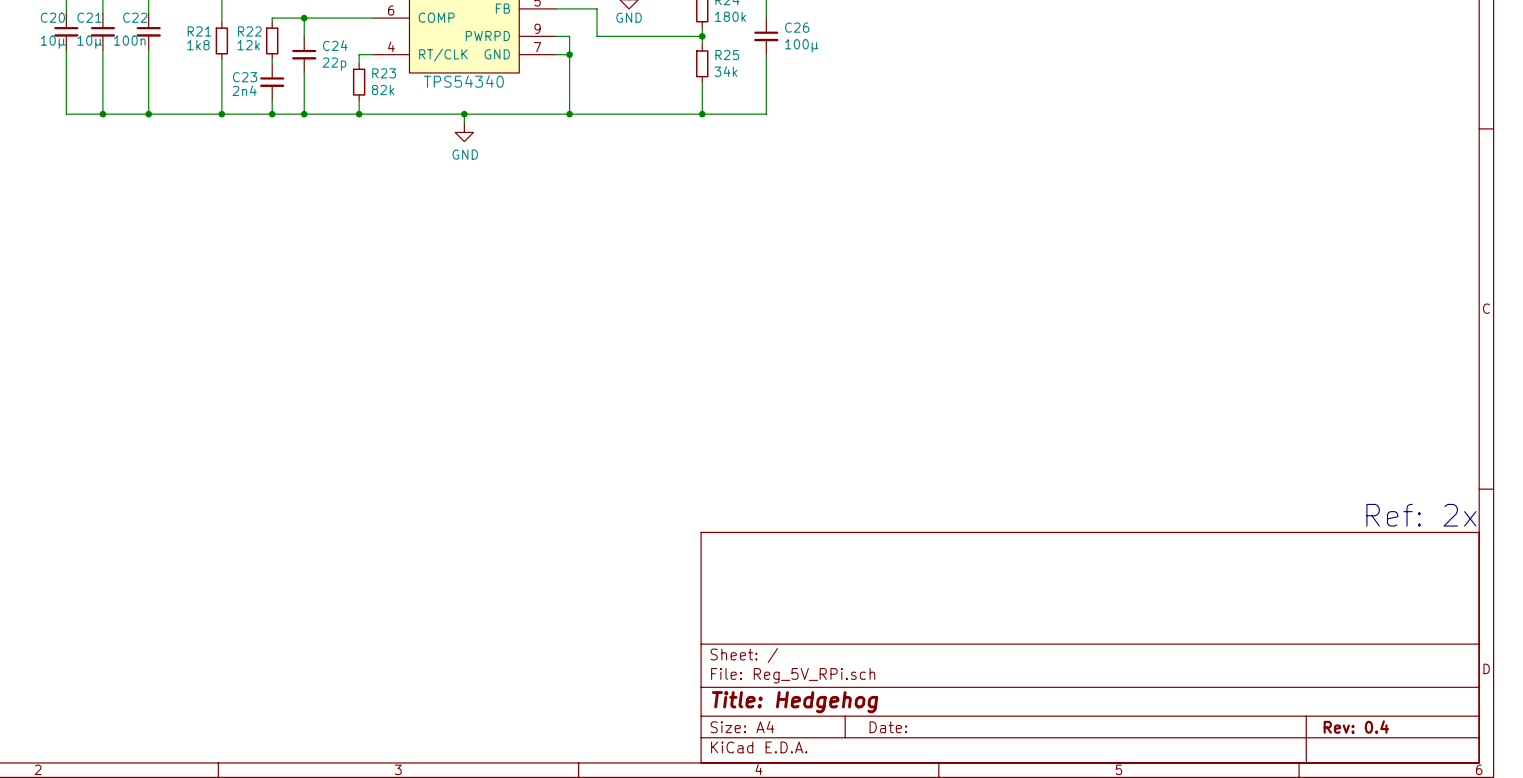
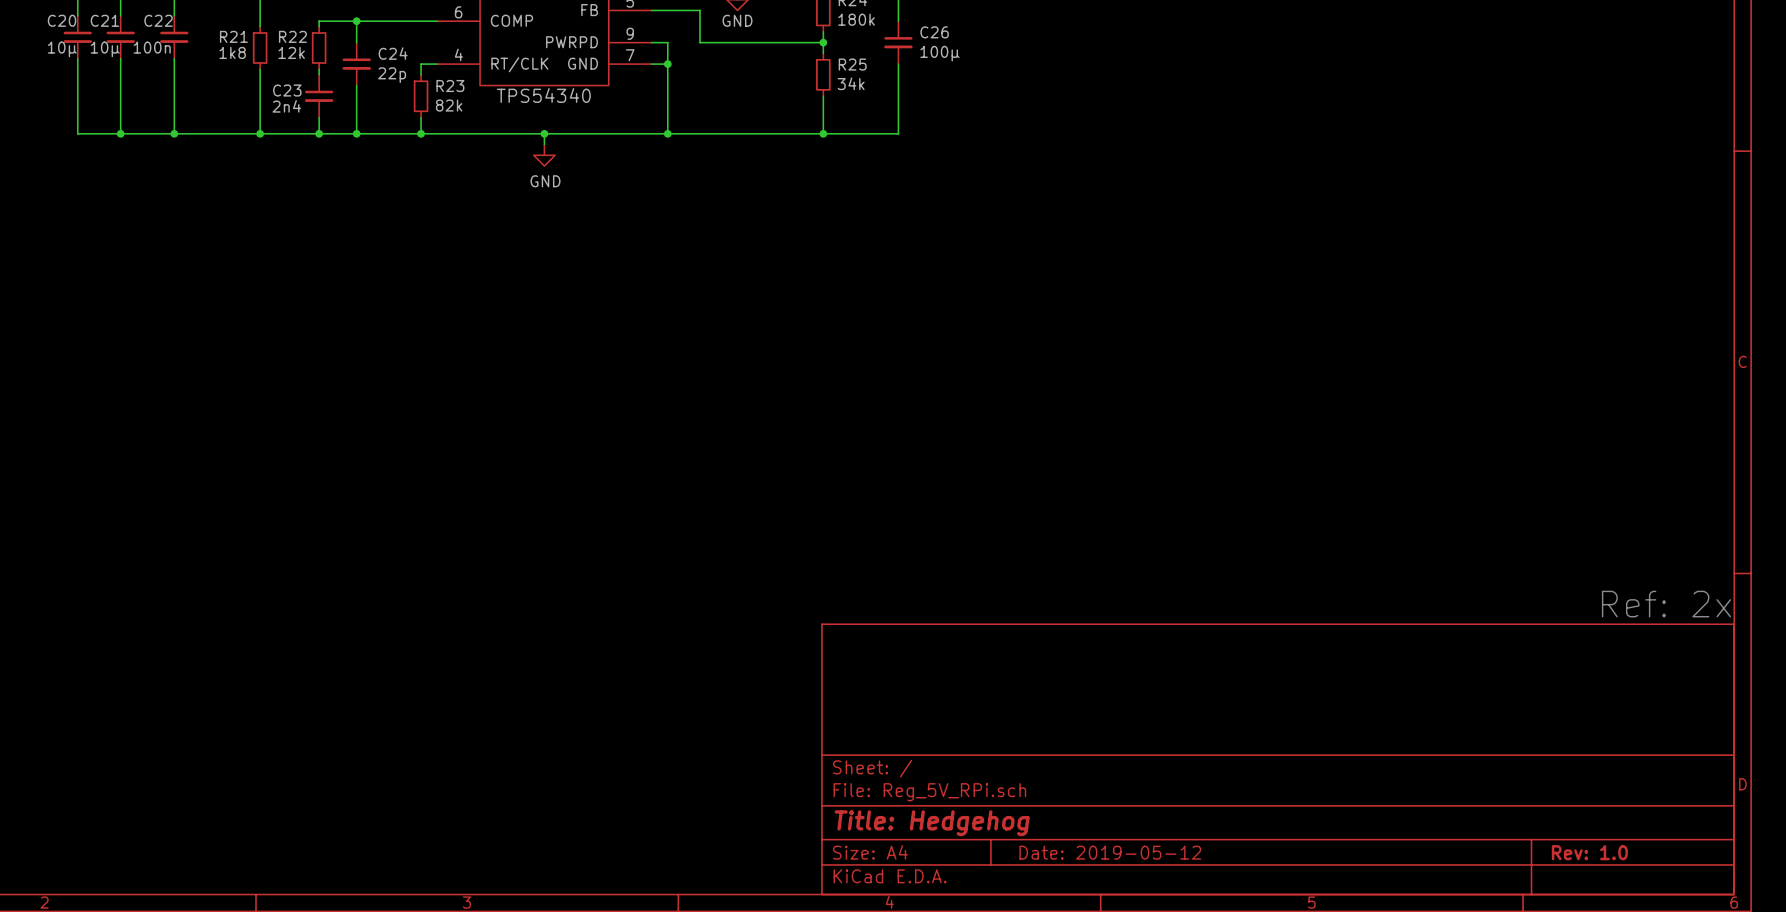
title block: Date: (888, 727) -> Date: 2019-05-12 (1110, 852)
title block: Rev: 0.4 (1356, 727) -> Rev: 1.0 (1589, 852)

